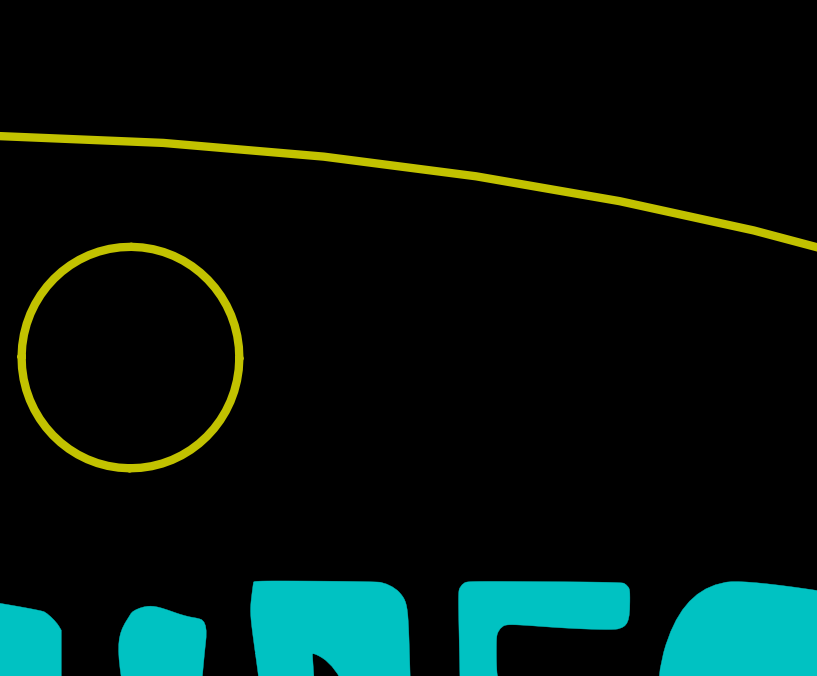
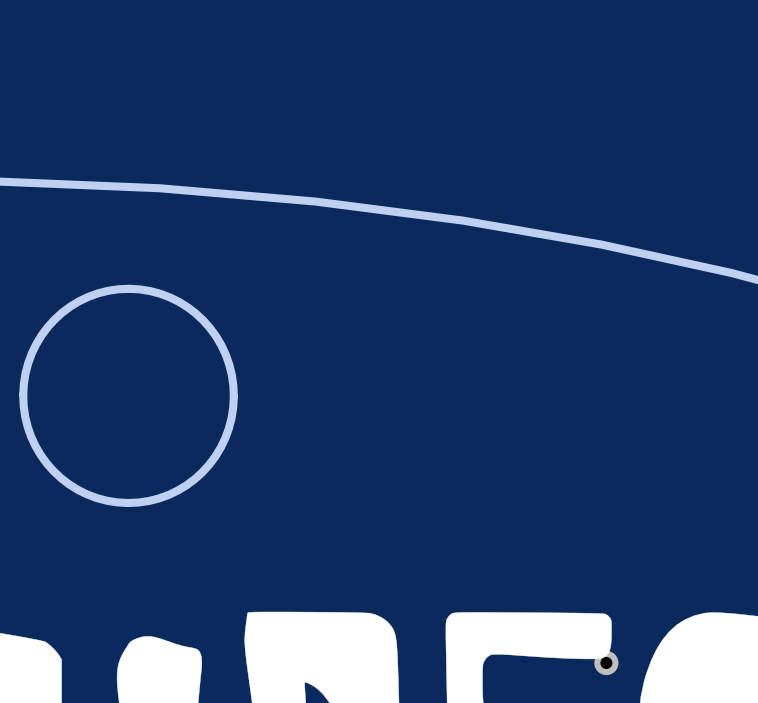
via: none -> (606, 663)

